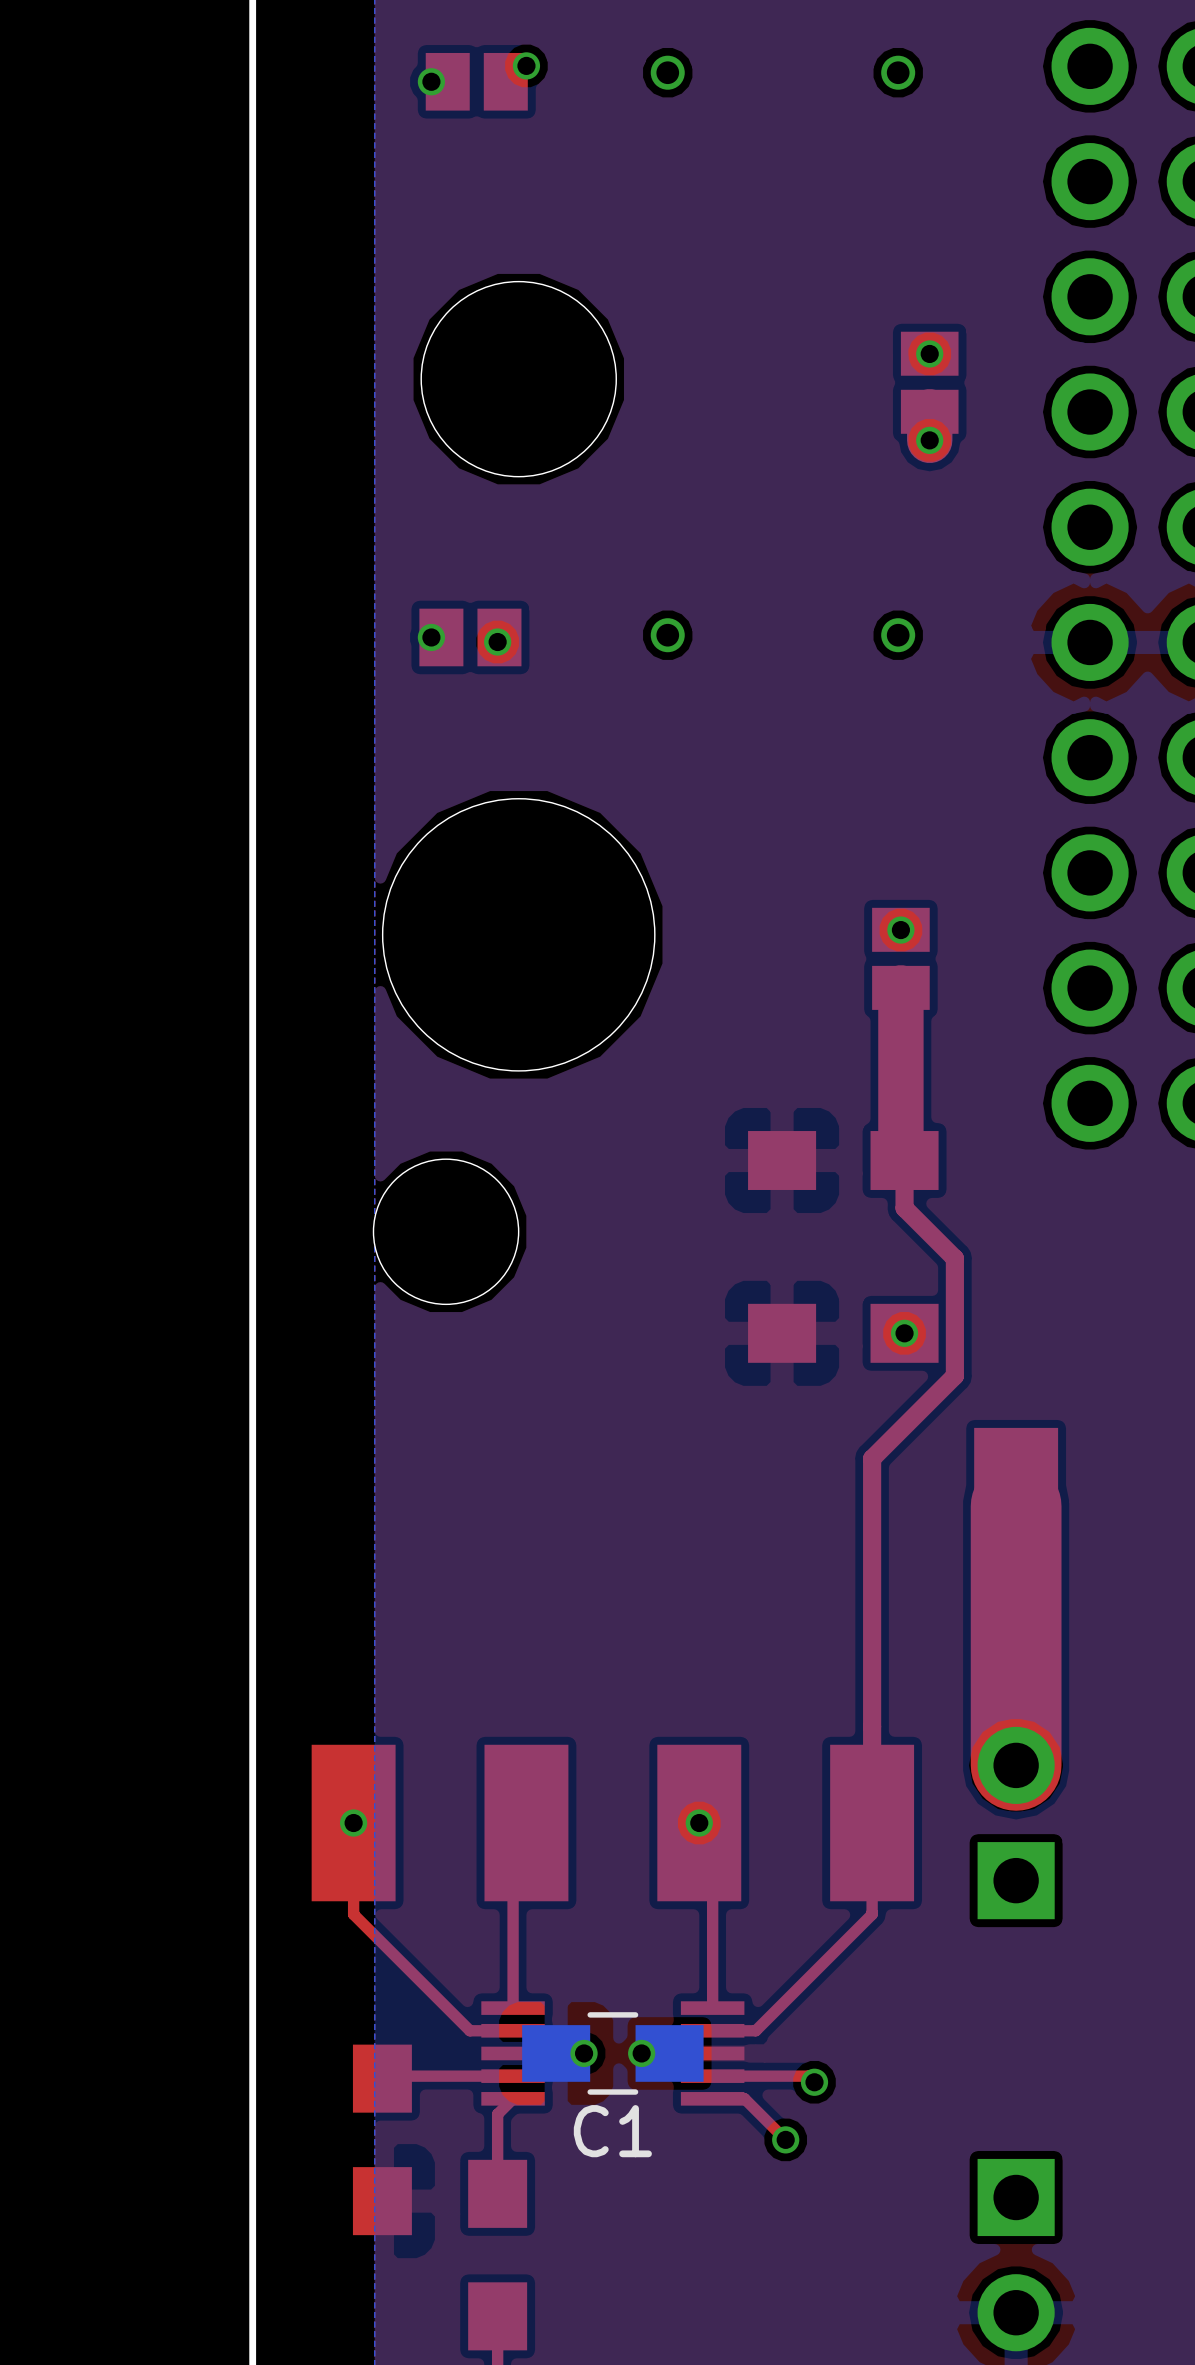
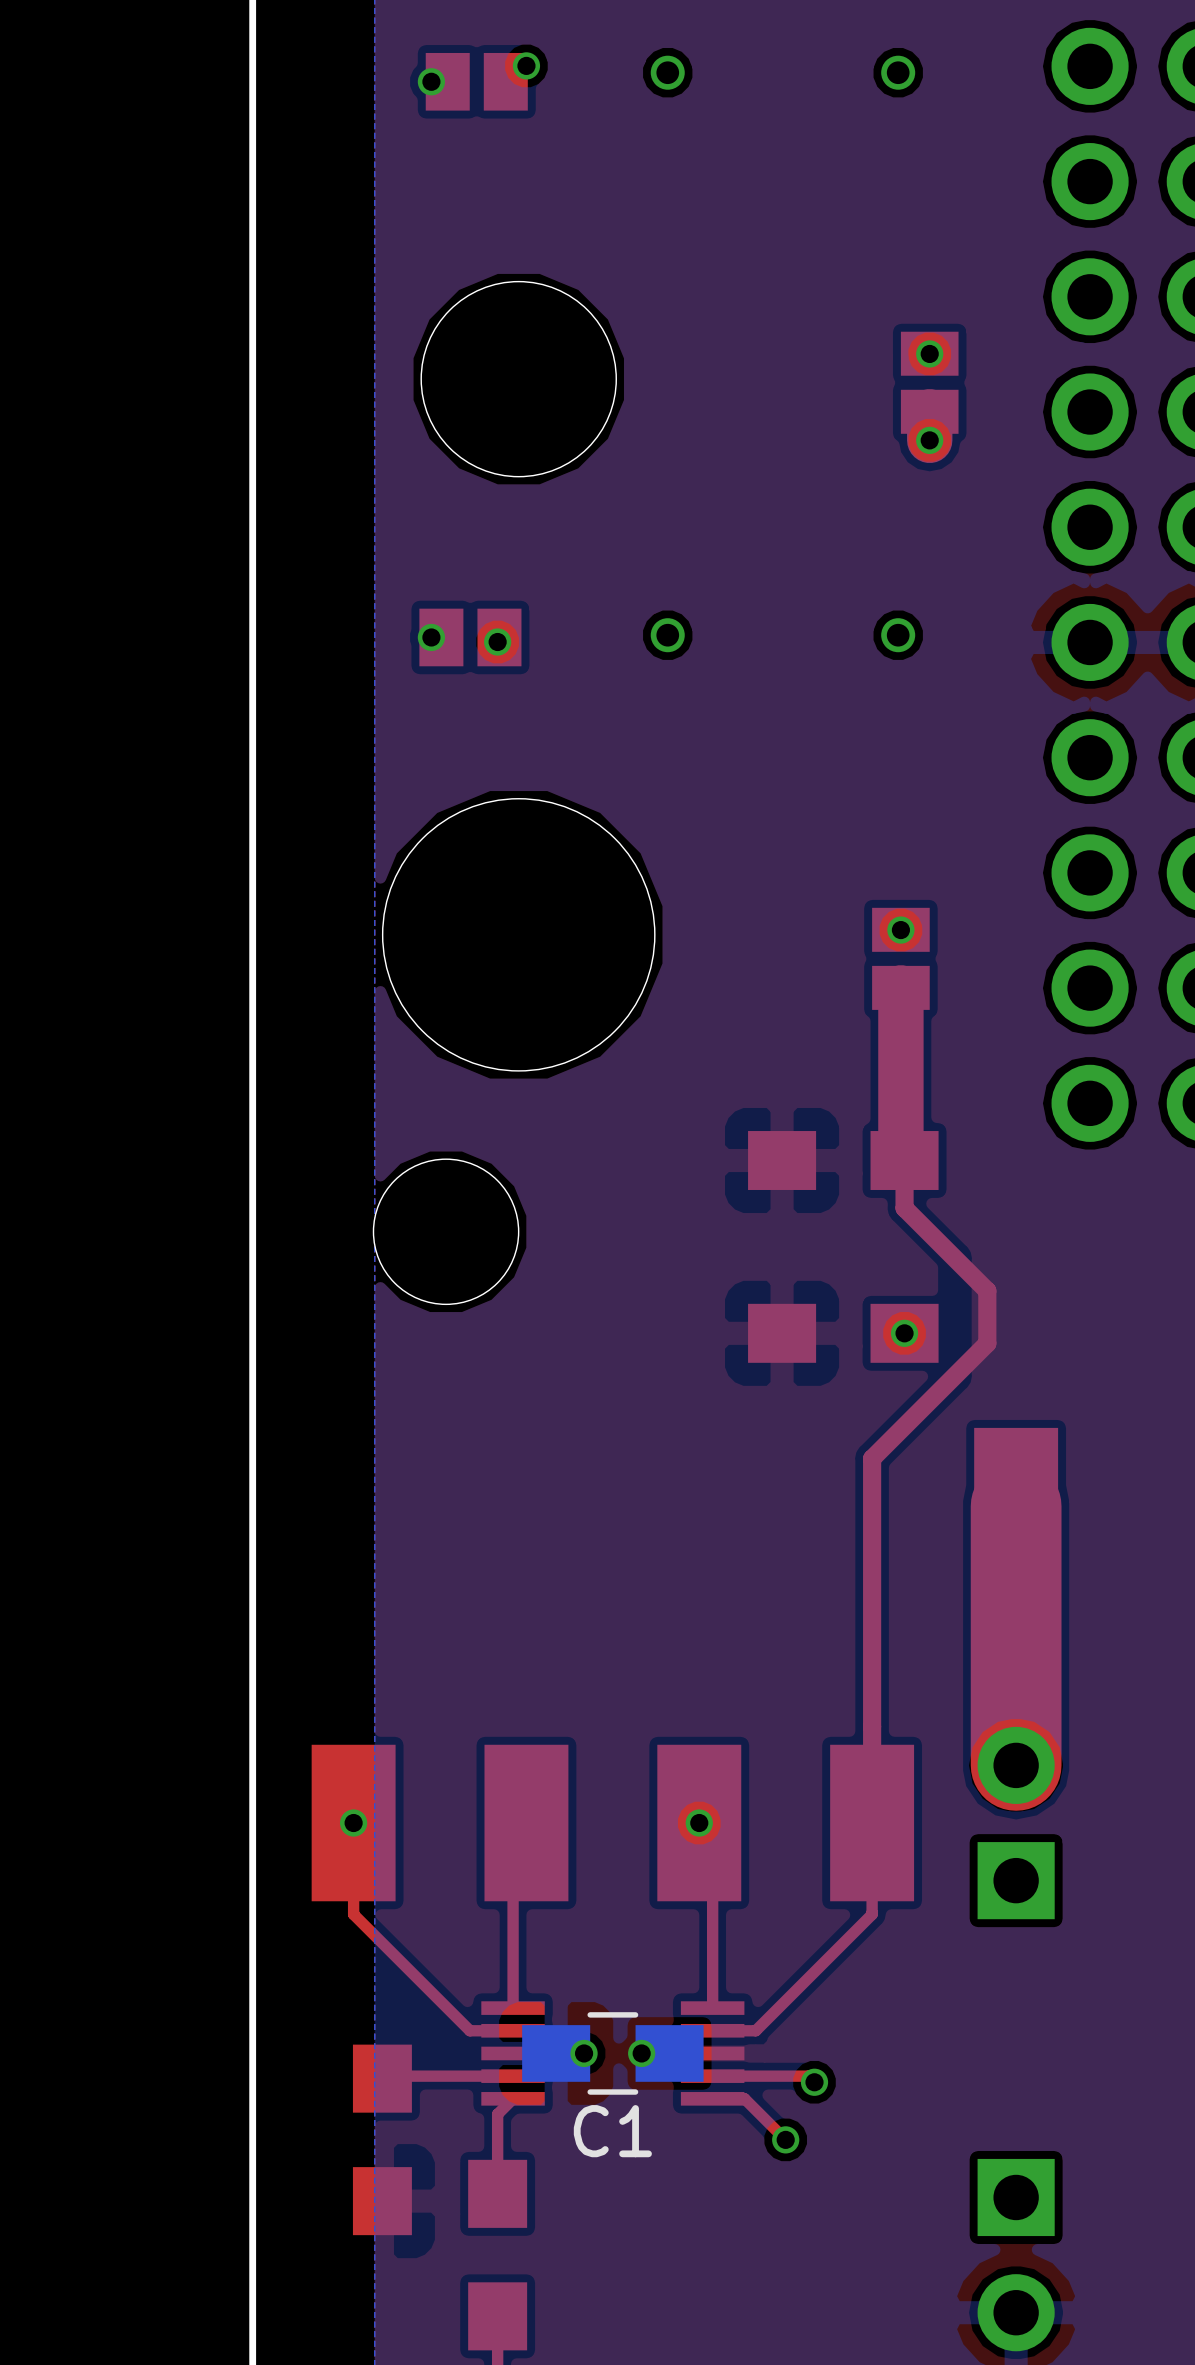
top track: (954, 1258) (954, 1375) -> (954, 1258) (987, 1290) (987, 1343) (954, 1375)

